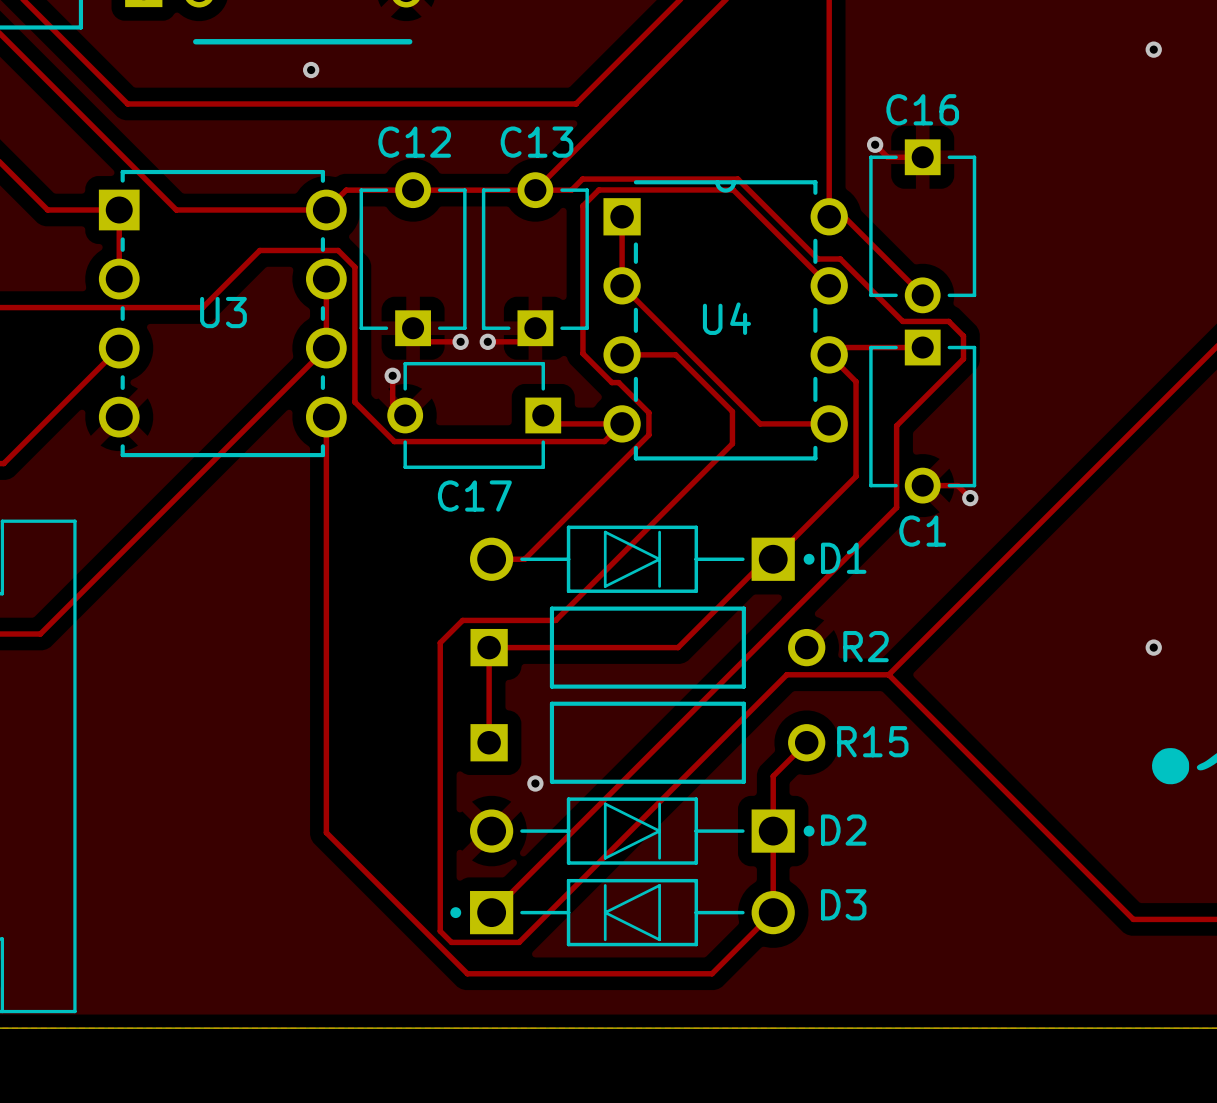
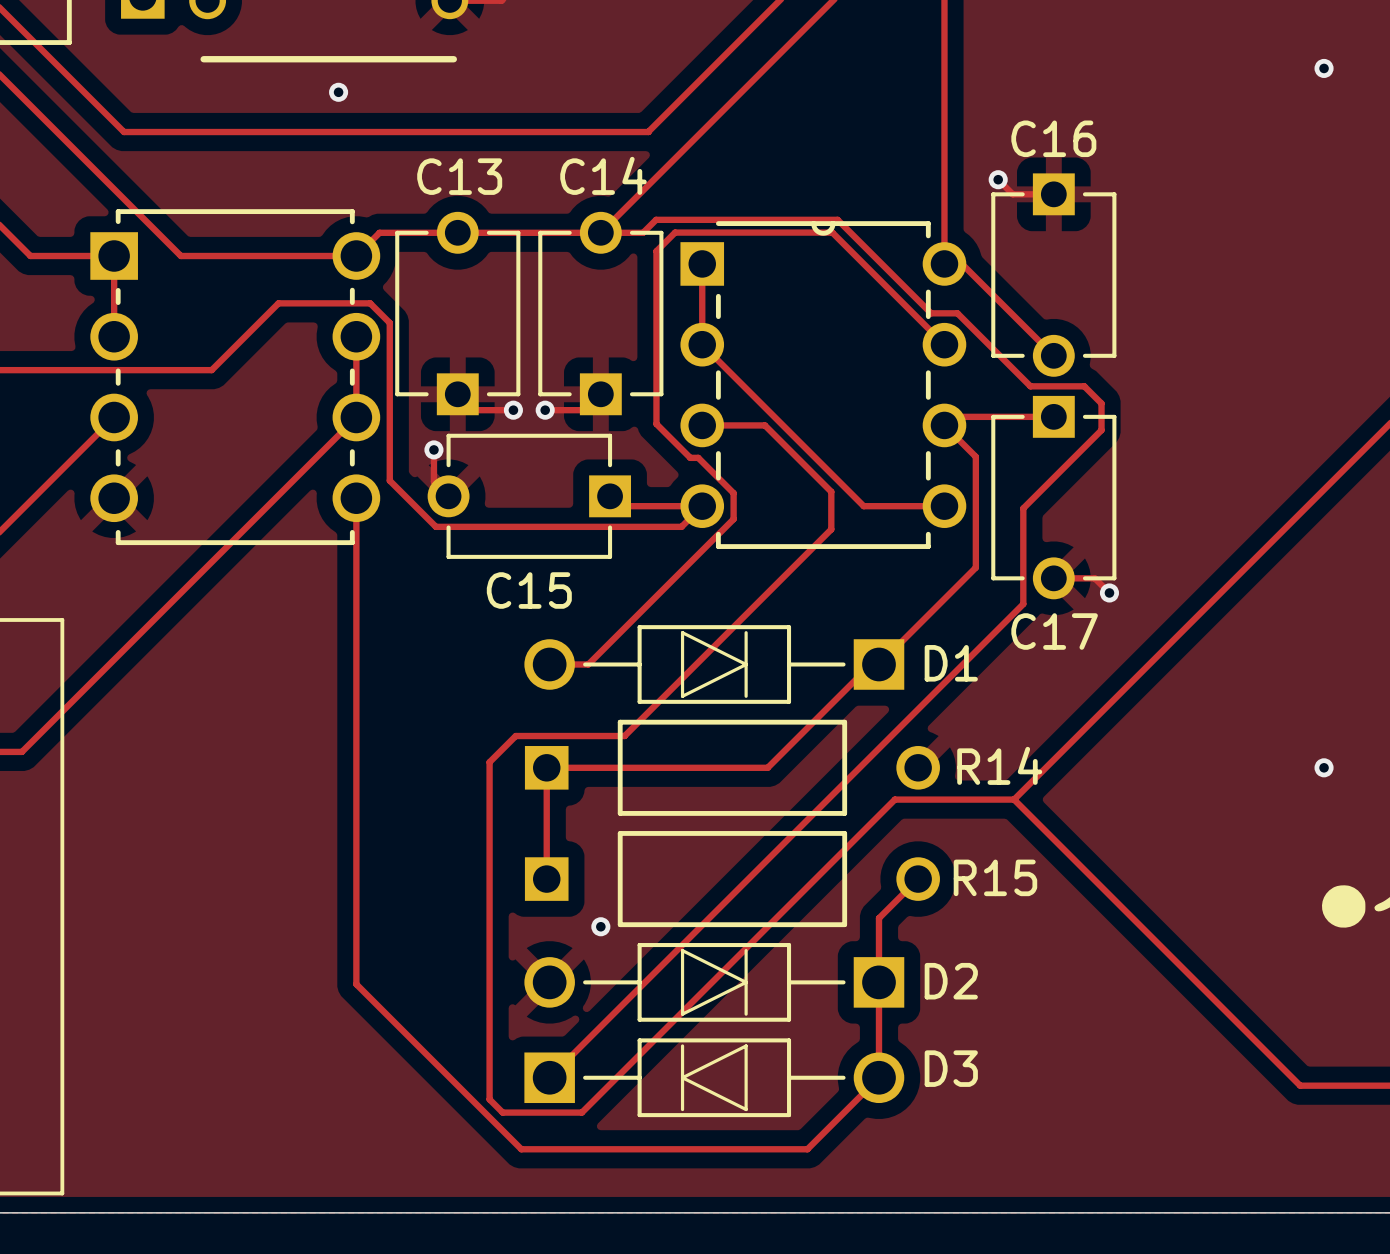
C12 name: C12 (414, 142) -> C13 (459, 176)
C13 name: C13 (537, 142) -> C14 (603, 175)
U3 name: U3 (223, 312) -> none
U4 name: U4 (726, 318) -> none
C17 name: C17 (474, 496) -> C15 (529, 590)
D1 footprint: [470, 525, 815, 593] -> [524, 625, 905, 704]
C1 name: C1 (922, 531) -> C17 (1054, 631)
R2 name: R2 (866, 646) -> R14 (999, 765)
D2 footprint: [470, 797, 815, 865] -> [524, 943, 905, 1022]
D3 footprint: [450, 878, 795, 947] -> [524, 1038, 905, 1118]

